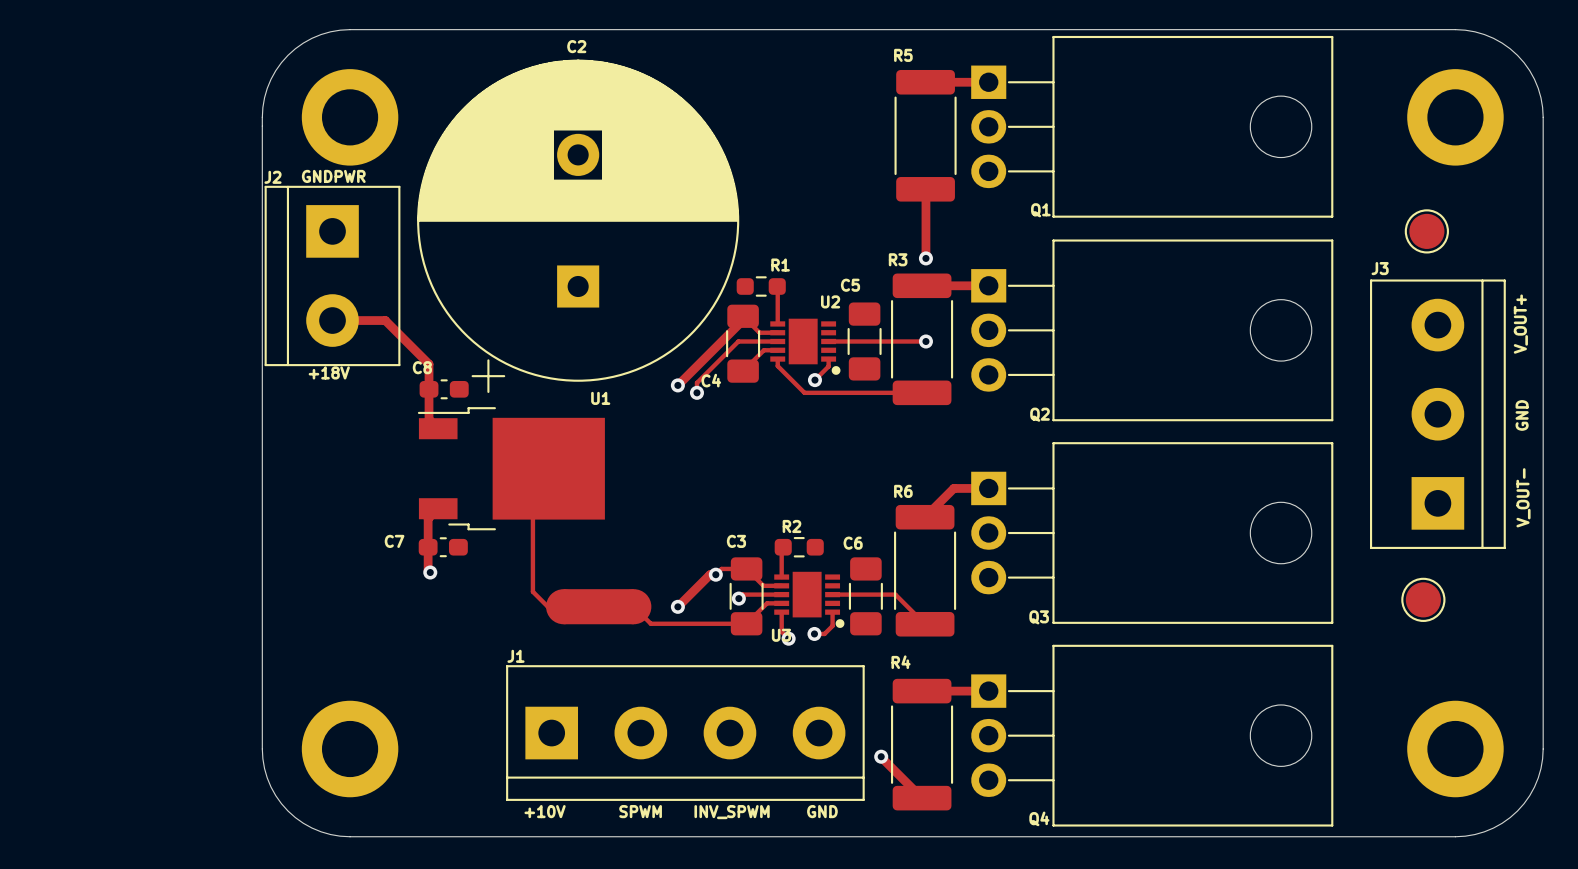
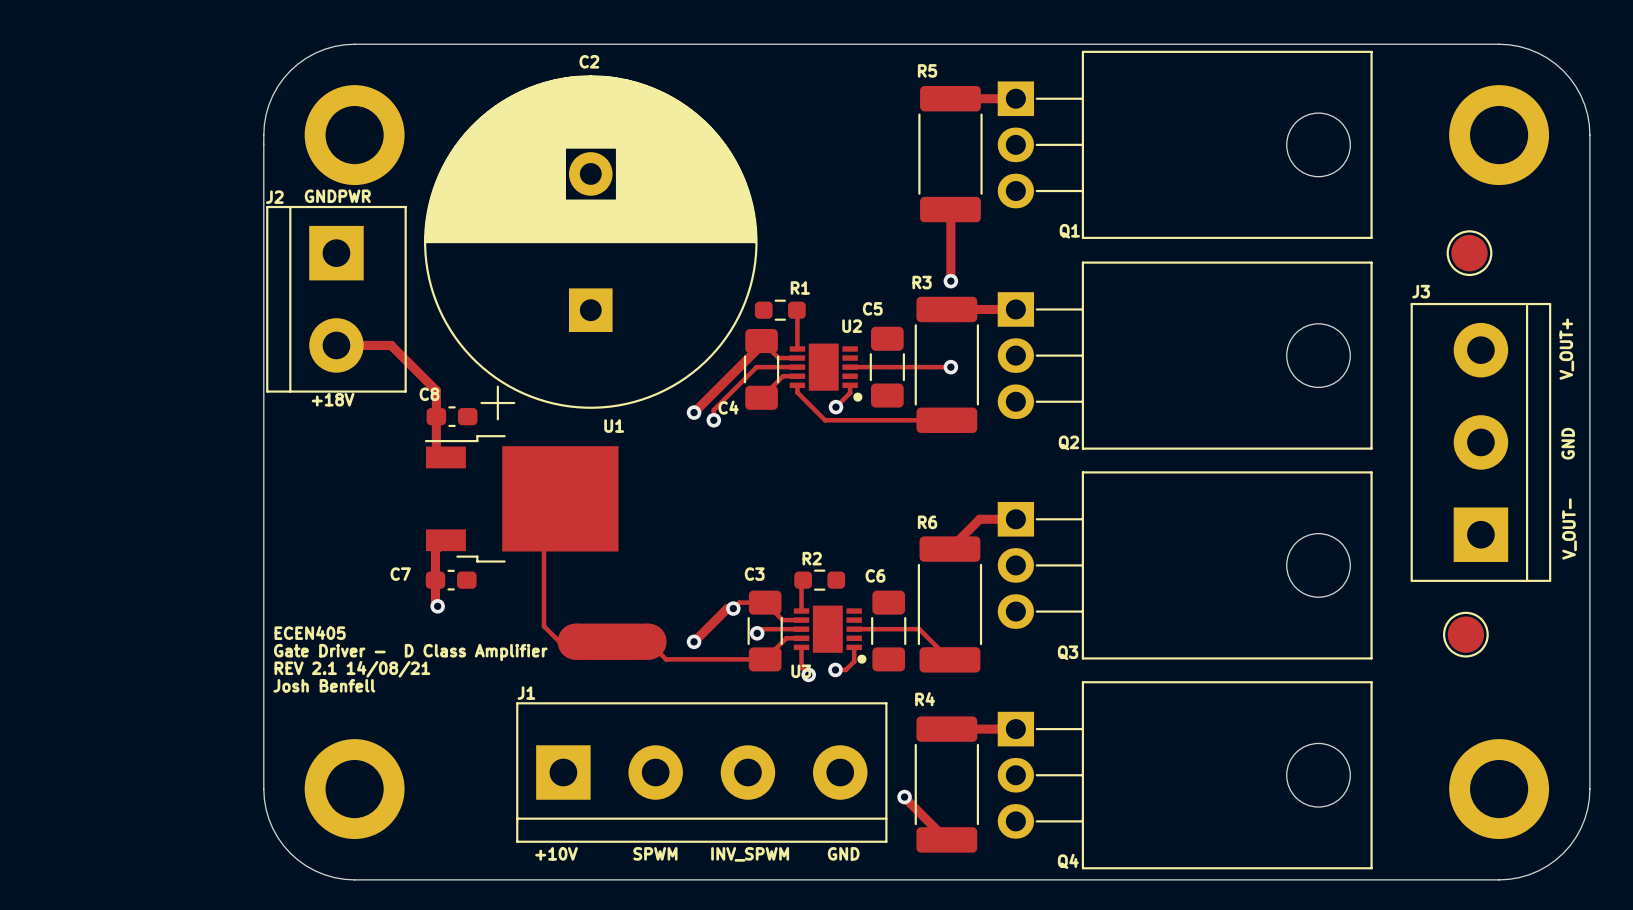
text: none -> ECEN405 (310, 632)
text: none -> Gate Driver - D Class Amplifier (410, 652)
text: none -> REV 2.1 14/08/21 (352, 669)
text: none -> Josh Benfell (324, 685)

